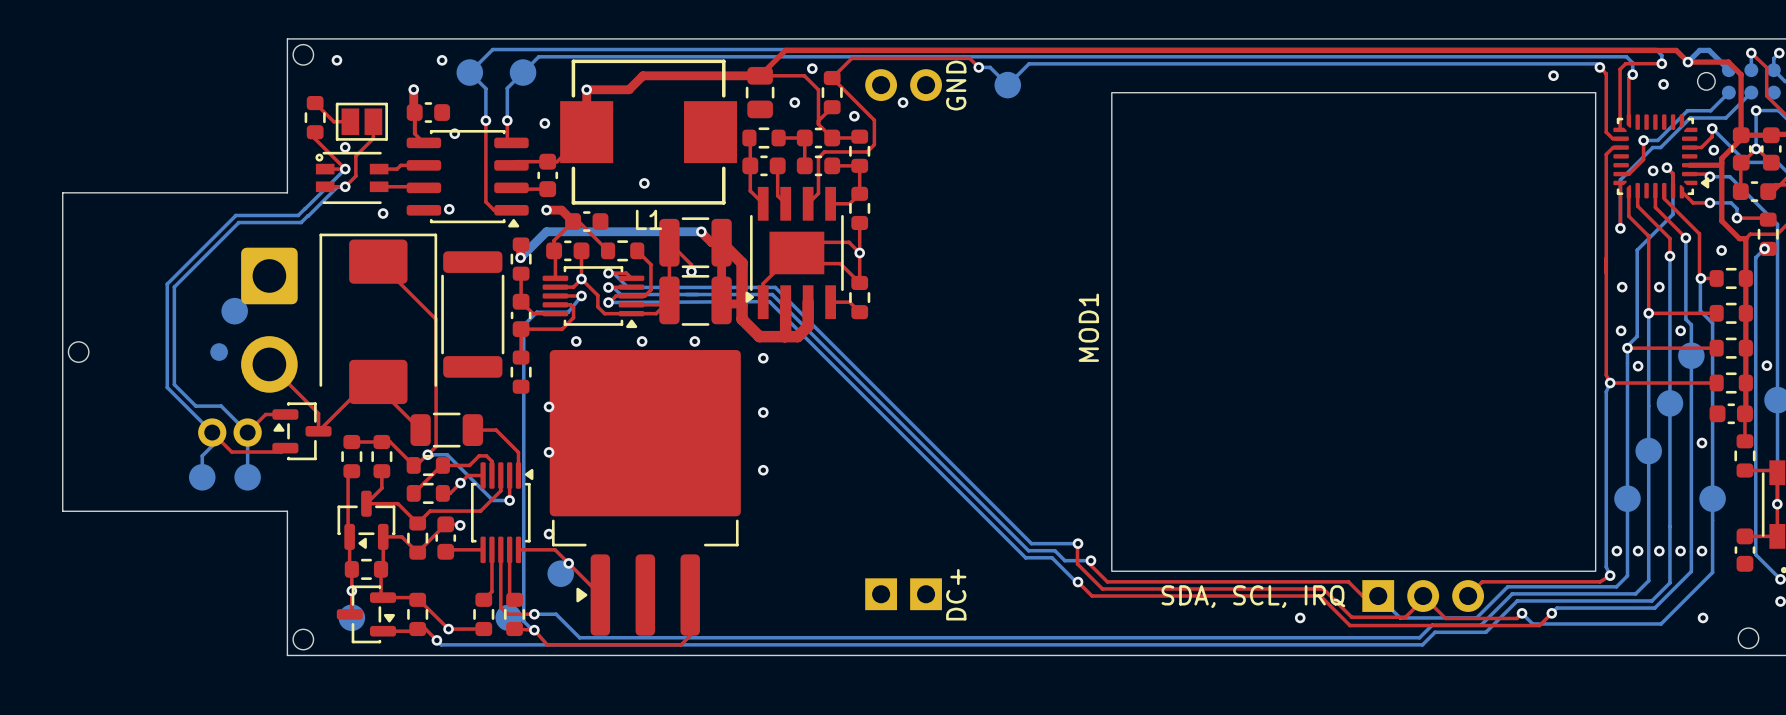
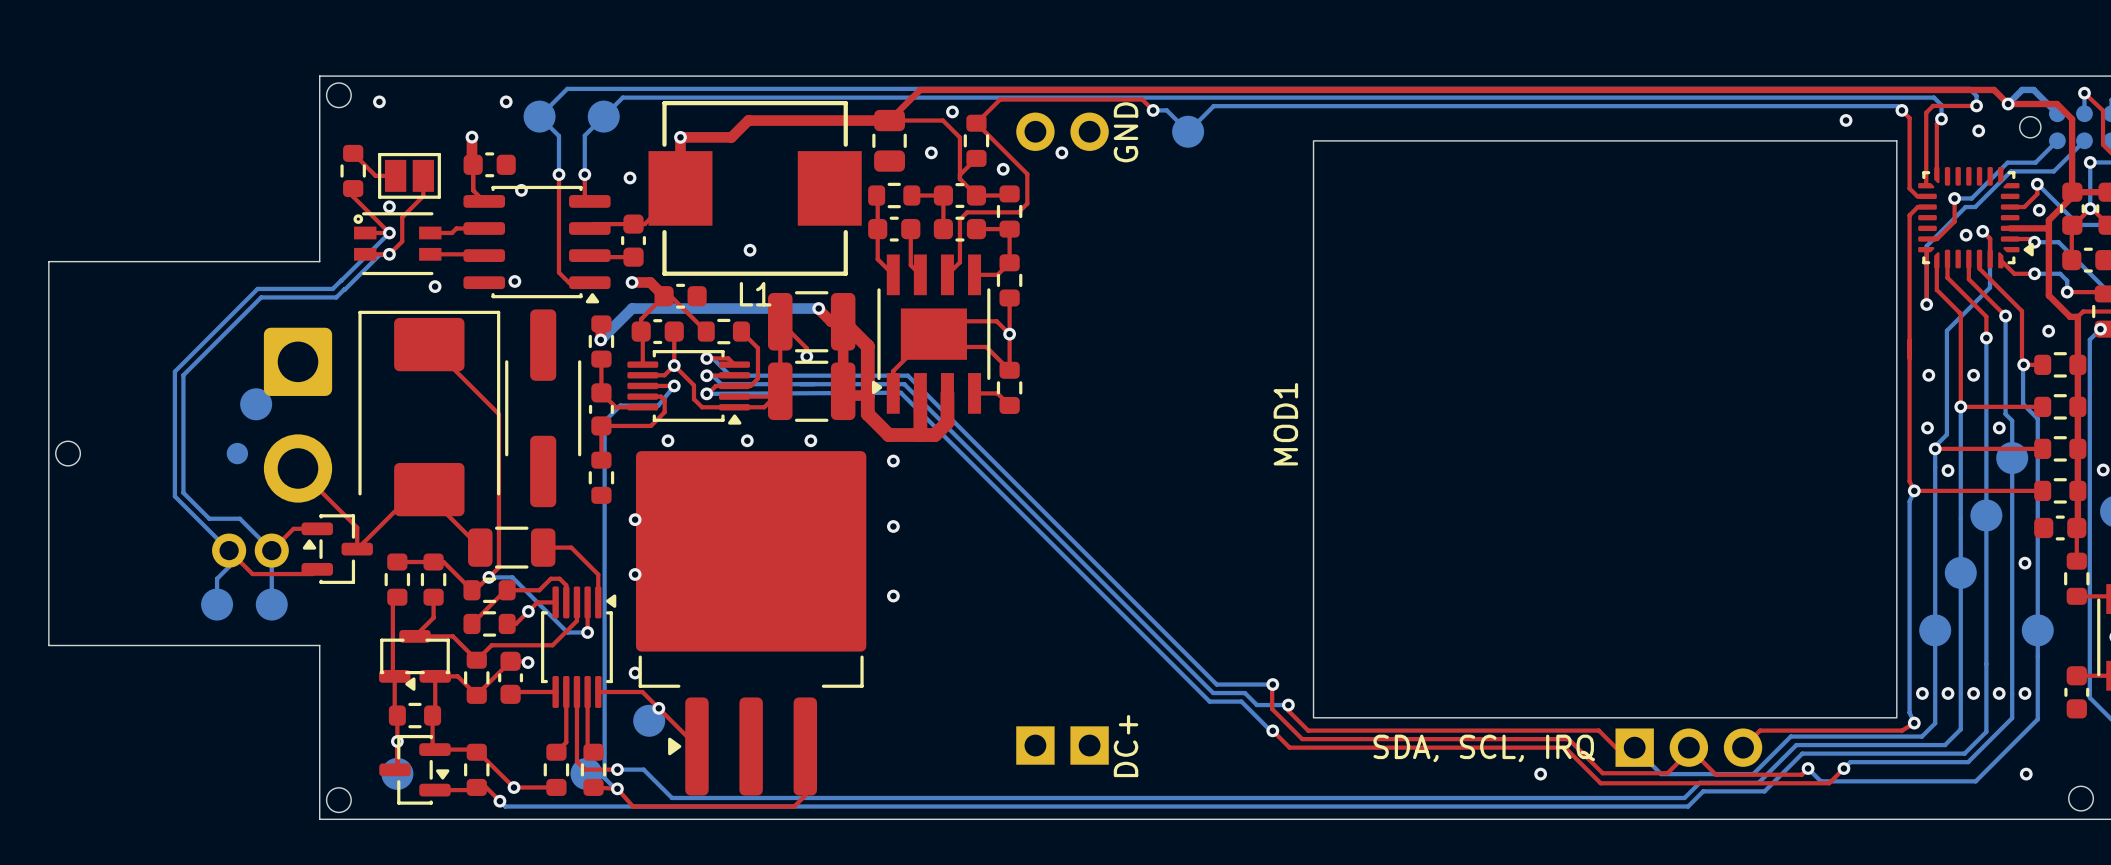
part footprint: [441, 251, 505, 378] -> [505, 309, 582, 508]
part footprint: [337, 490, 396, 550] -> [378, 629, 451, 691]

